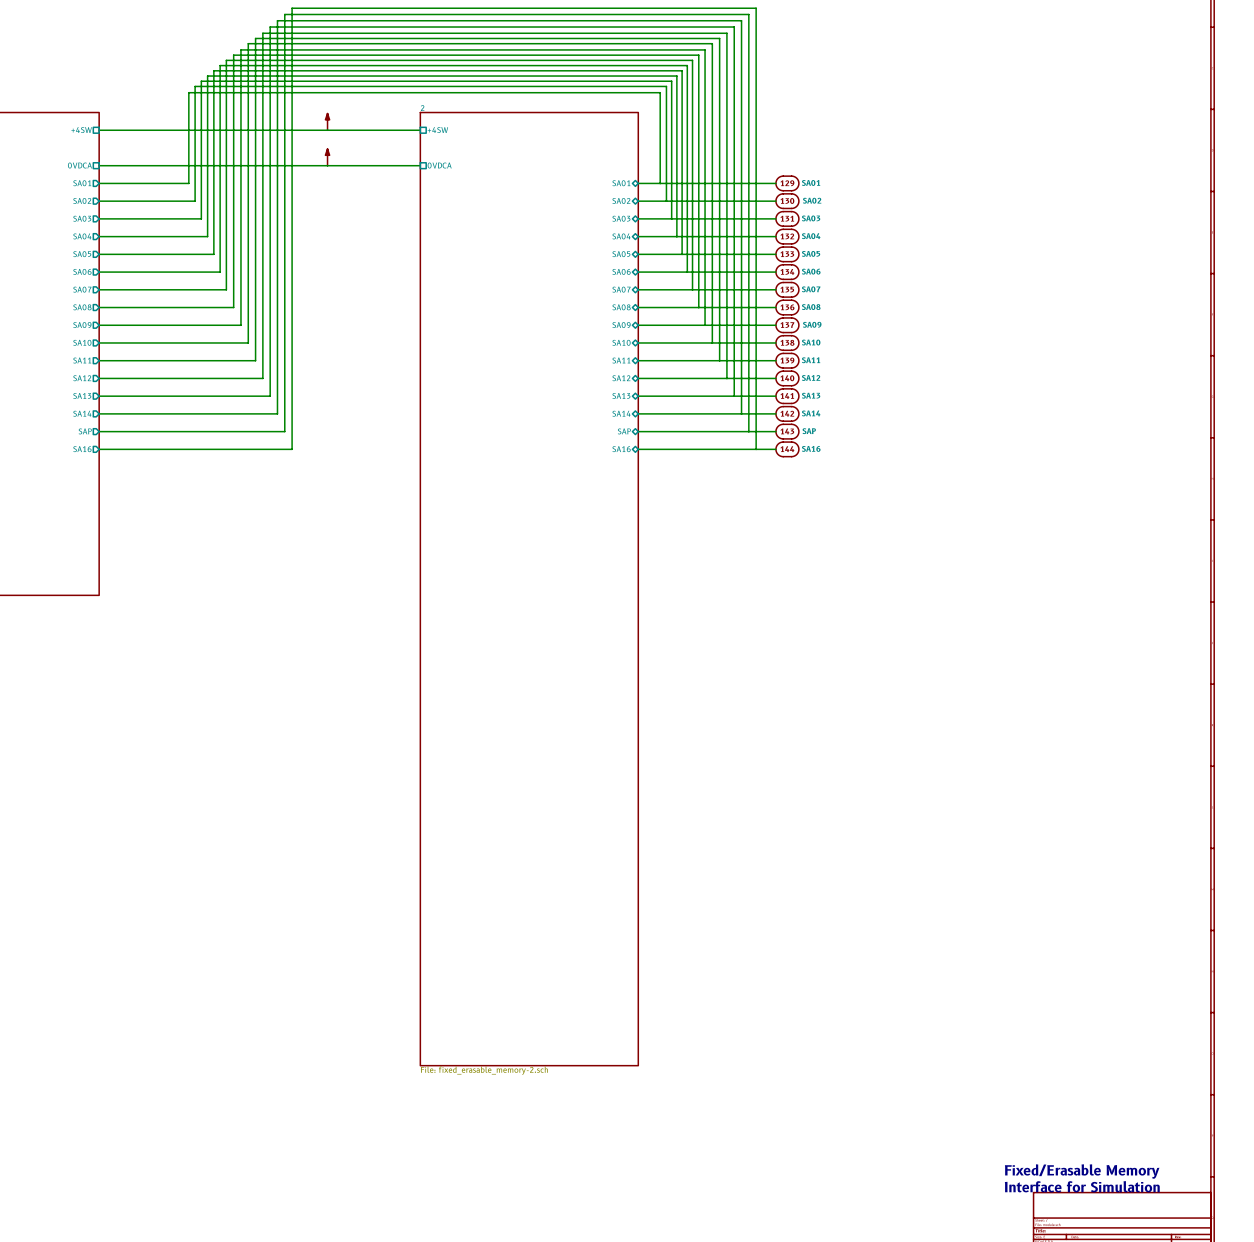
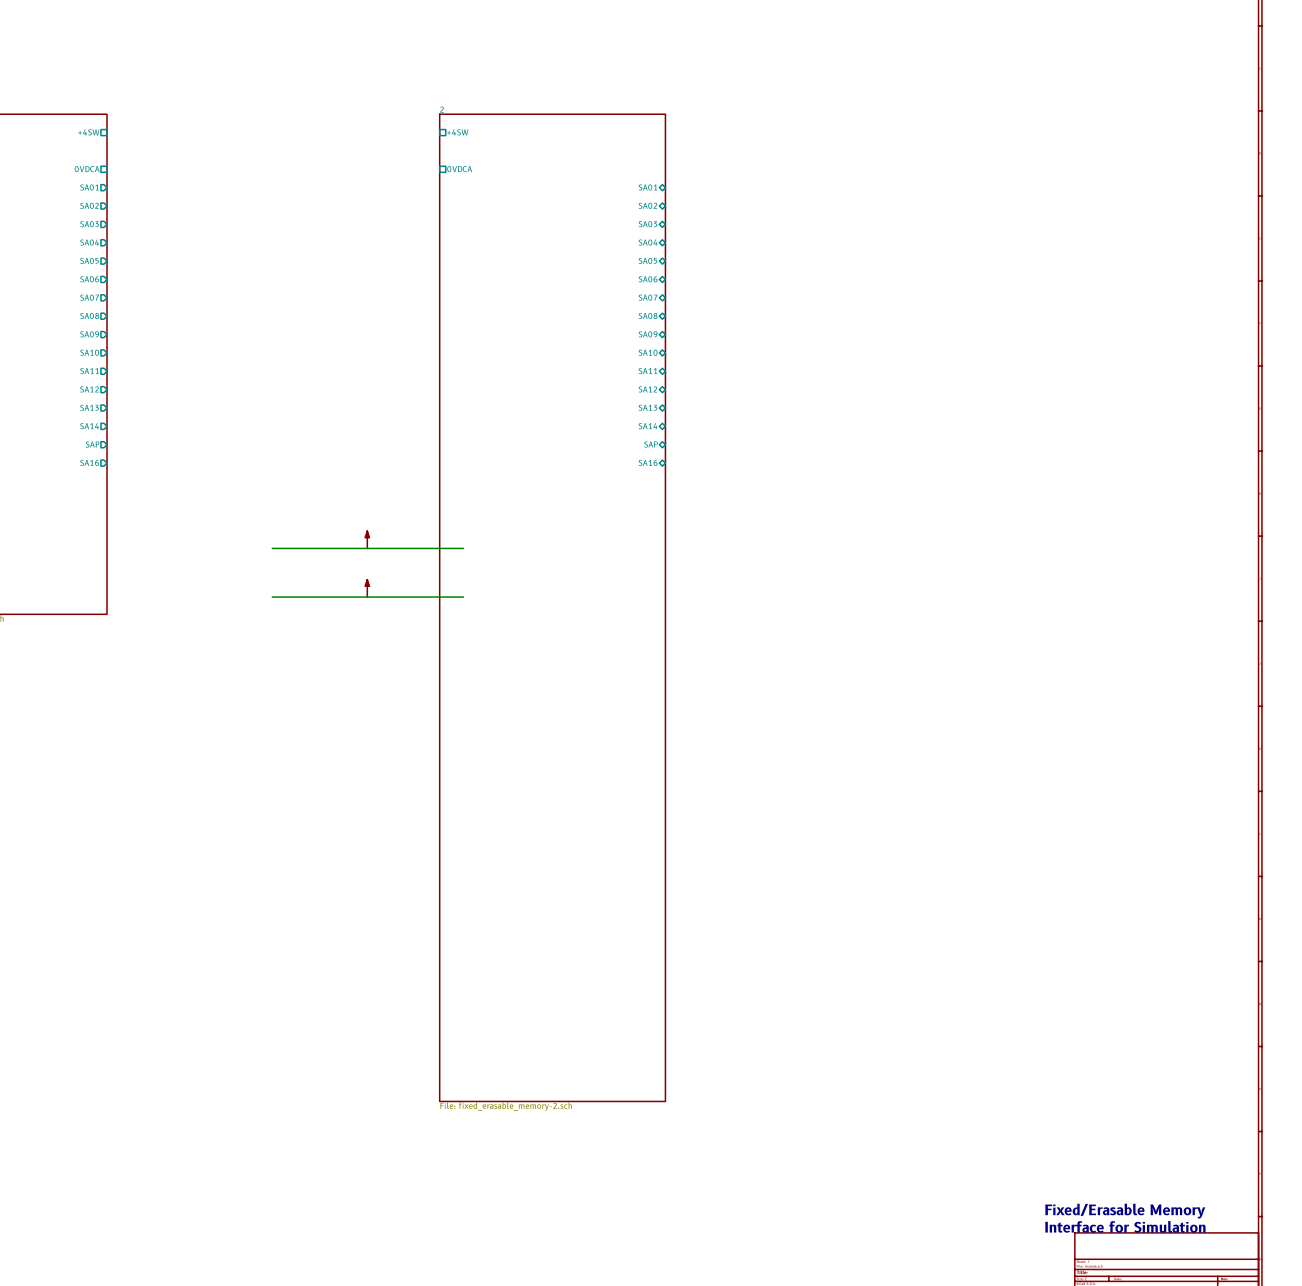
power symbol: (327, 121) -> none
wire: (99, 130) (420, 130) -> none
power symbol: (327, 157) -> none
wire: (99, 165) (420, 165) -> none
wire: (99, 183) (188, 183) (188, 92) (660, 92) (660, 183) -> none
wire: (638, 183) (775, 183) -> none
part: (787, 183) -> none
wire: (99, 201) (195, 201) (195, 86) (666, 86) (666, 201) -> none
wire: (638, 201) (775, 201) -> none
part: (787, 201) -> none
wire: (99, 218) (201, 218) (201, 81) (671, 81) (671, 218) -> none
wire: (638, 218) (775, 218) -> none
part: (787, 218) -> none
wire: (99, 236) (207, 236) (207, 76) (676, 76) (676, 236) -> none
wire: (638, 236) (775, 236) -> none
part: (787, 236) -> none
wire: (99, 254) (213, 254) (213, 70) (682, 70) (682, 254) -> none
wire: (638, 254) (775, 254) -> none
part: (787, 254) -> none
wire: (99, 272) (220, 272) (220, 65) (687, 65) (687, 272) -> none
wire: (638, 272) (775, 272) -> none
part: (787, 272) -> none
wire: (99, 289) (226, 289) (226, 60) (692, 60) (692, 289) -> none
wire: (638, 289) (775, 289) -> none
part: (787, 289) -> none
wire: (99, 307) (233, 307) (233, 55) (698, 55) (698, 307) -> none
wire: (638, 307) (775, 307) -> none
part: (787, 307) -> none
wire: (99, 325) (240, 325) (240, 49) (705, 49) (705, 325) -> none
wire: (638, 325) (775, 325) -> none
part: (787, 325) -> none
wire: (99, 342) (248, 342) (248, 43) (712, 43) (712, 342) -> none
wire: (638, 342) (775, 342) -> none
part: (787, 342) -> none
wire: (99, 360) (255, 360) (255, 38) (719, 38) (719, 360) -> none
wire: (638, 360) (775, 360) -> none
part: (787, 360) -> none
wire: (99, 378) (262, 378) (262, 33) (726, 33) (726, 378) -> none
wire: (638, 378) (775, 378) -> none
part: (787, 378) -> none
wire: (99, 396) (270, 396) (270, 27) (734, 27) (734, 396) -> none
wire: (638, 396) (775, 396) -> none
part: (787, 396) -> none
wire: (99, 413) (277, 413) (277, 20) (741, 20) (741, 413) -> none
wire: (638, 413) (775, 413) -> none
part: (787, 413) -> none
wire: (99, 431) (284, 431) (284, 14) (748, 14) (748, 431) -> none
wire: (638, 431) (775, 431) -> none
part: (787, 431) -> none
wire: (99, 449) (292, 449) (292, 8) (756, 8) (756, 449) -> none
wire: (638, 449) (775, 449) -> none
part: (787, 449) -> none
power symbol: none -> (367, 539)
wire: none -> (272, 548) (463, 548)
power symbol: none -> (367, 588)
wire: none -> (272, 597) (463, 597)

